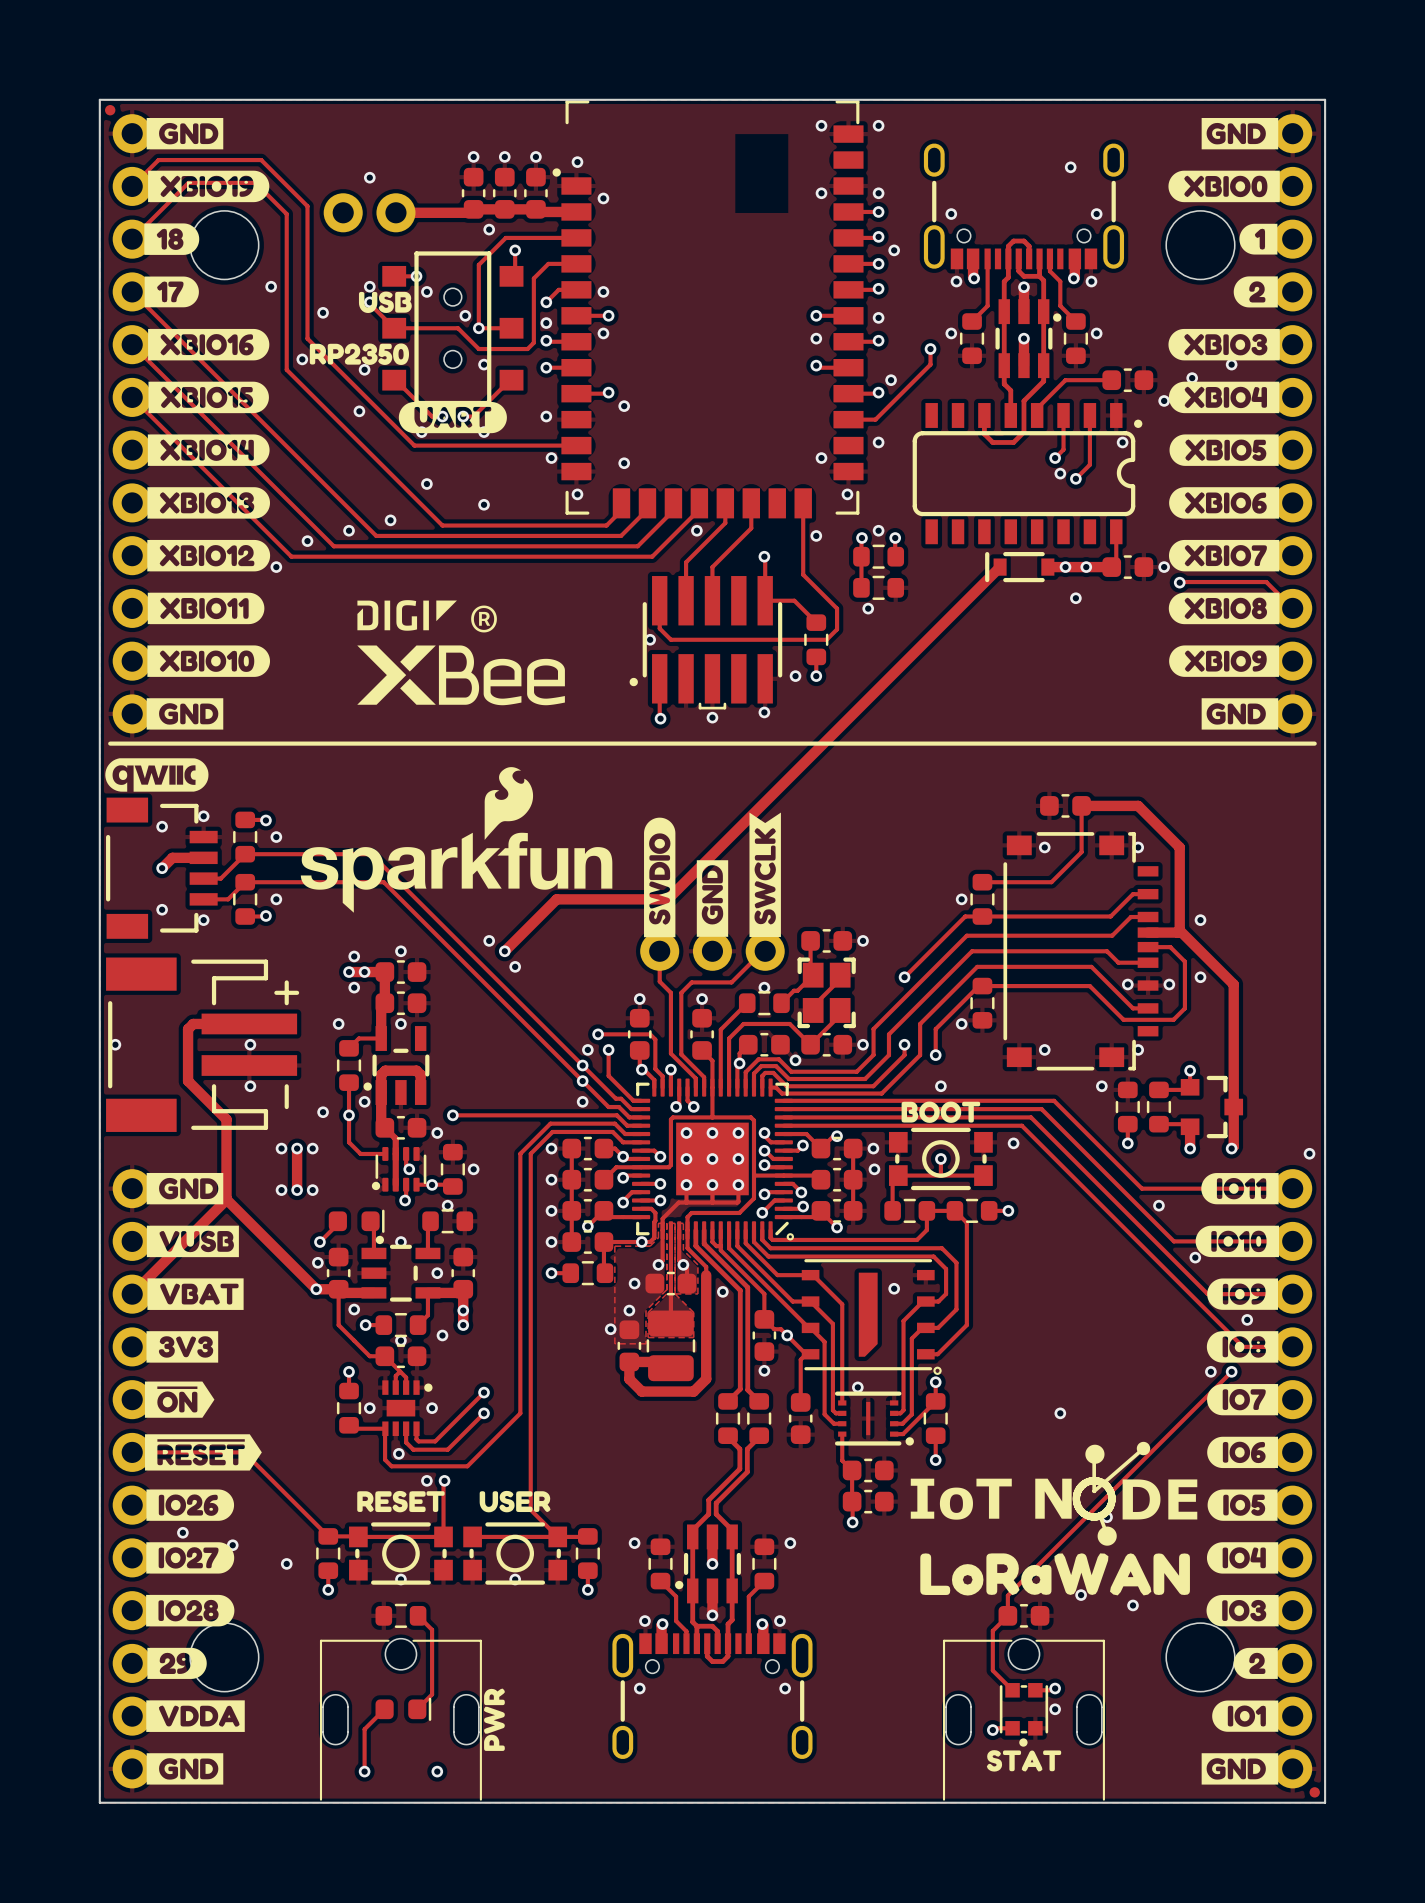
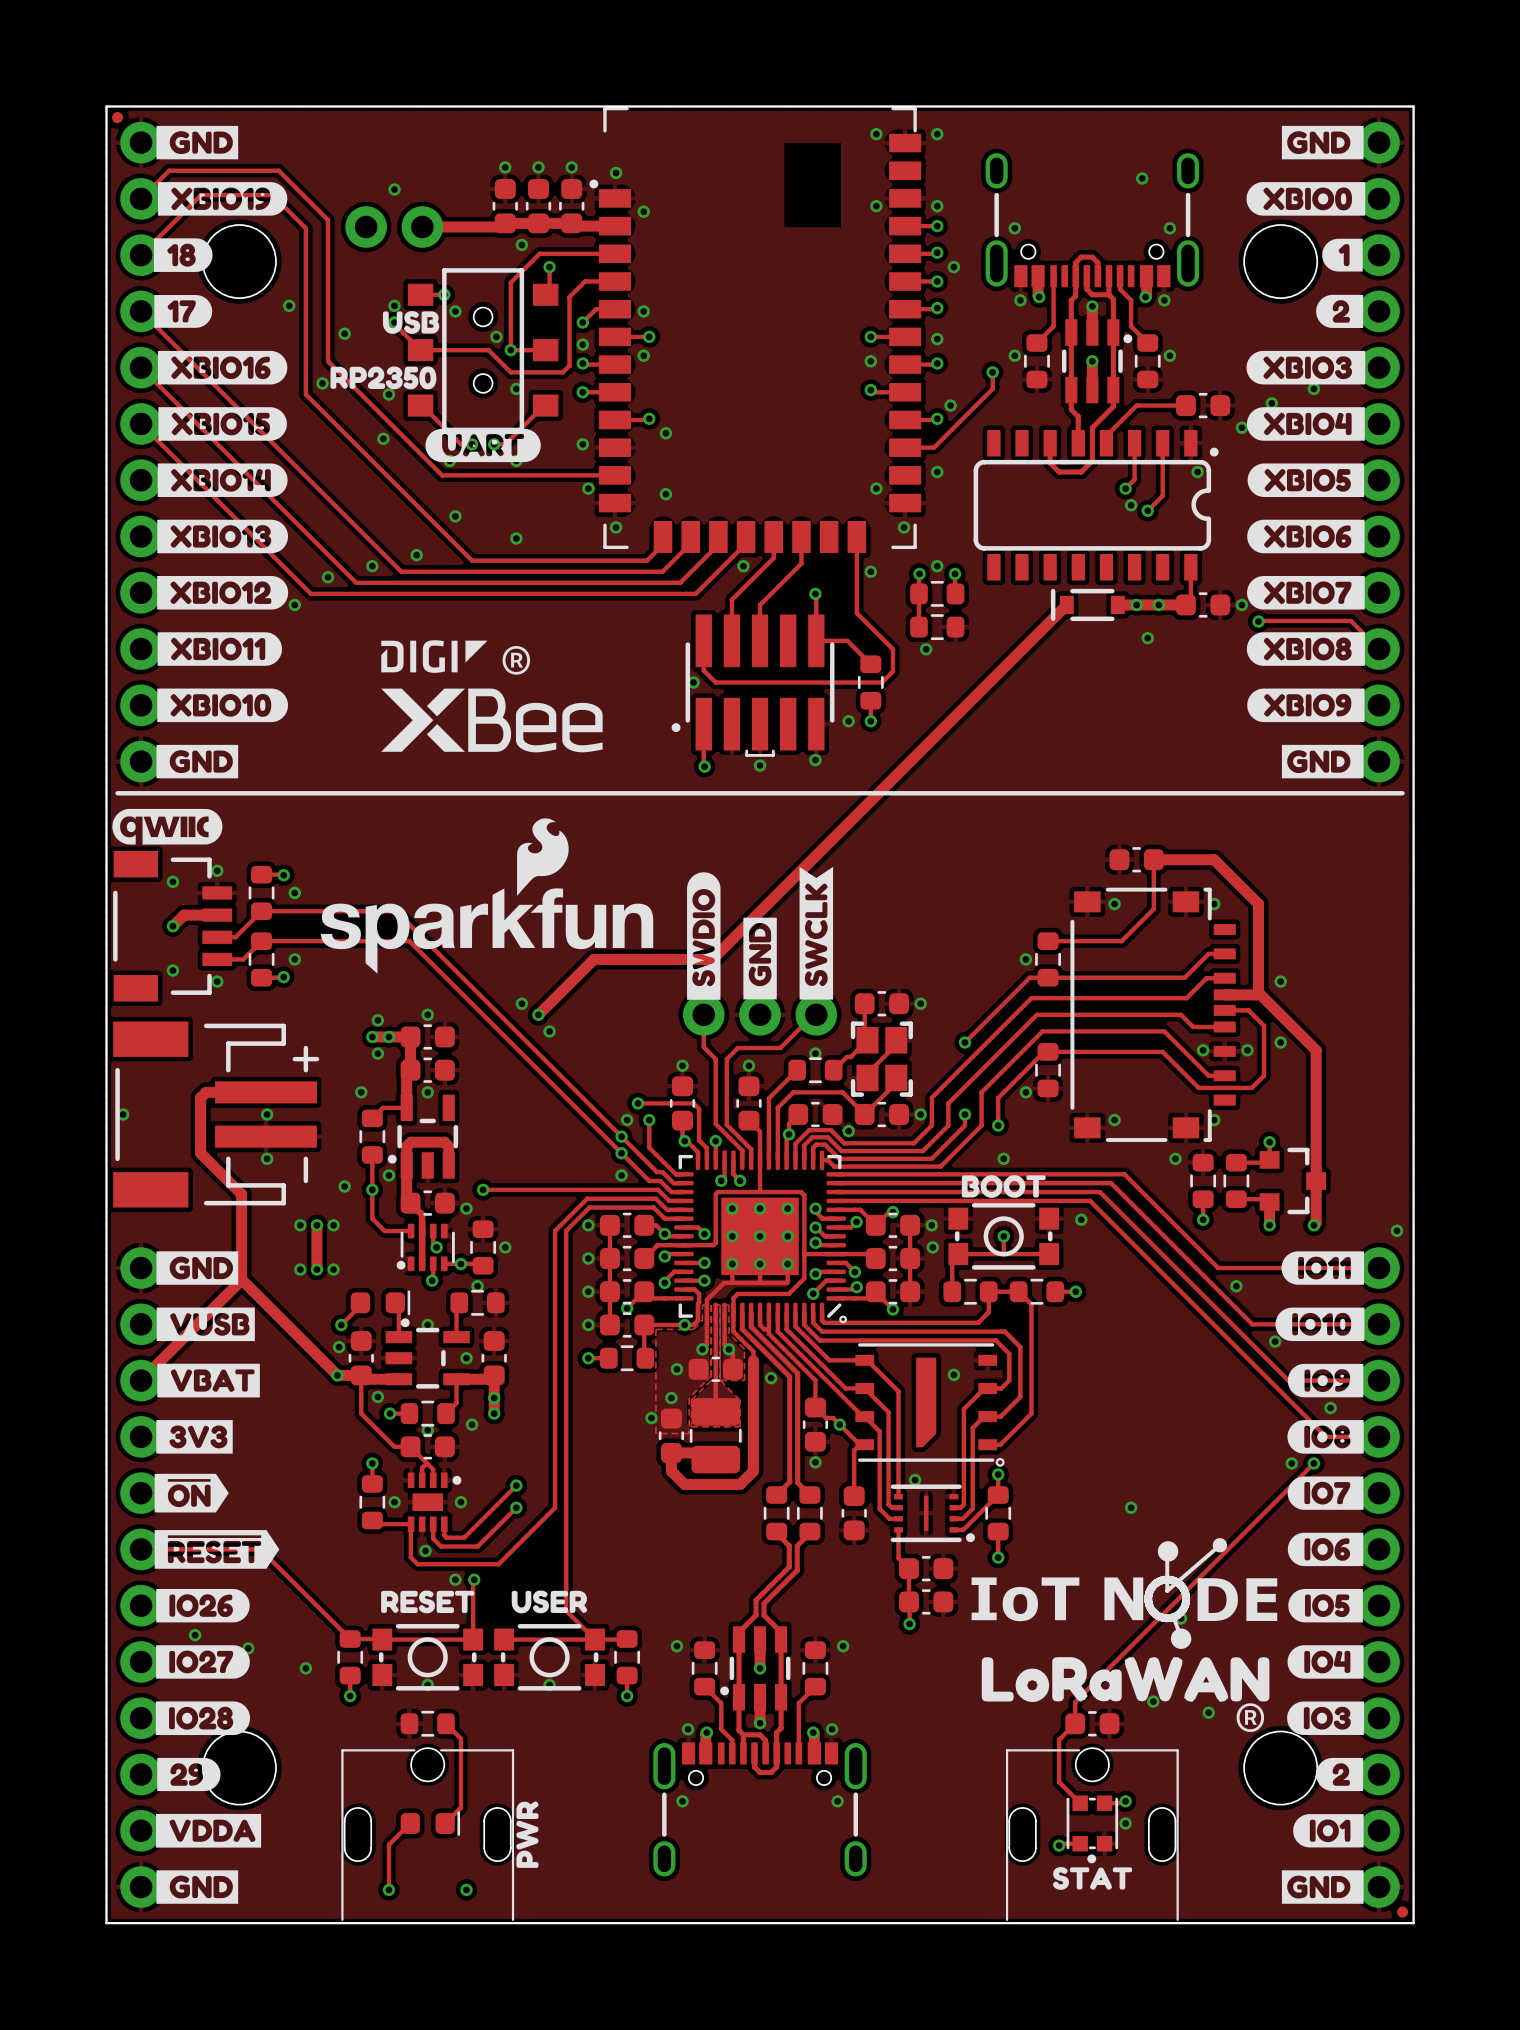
drawing: none -> [1236, 1703, 1265, 1732]

